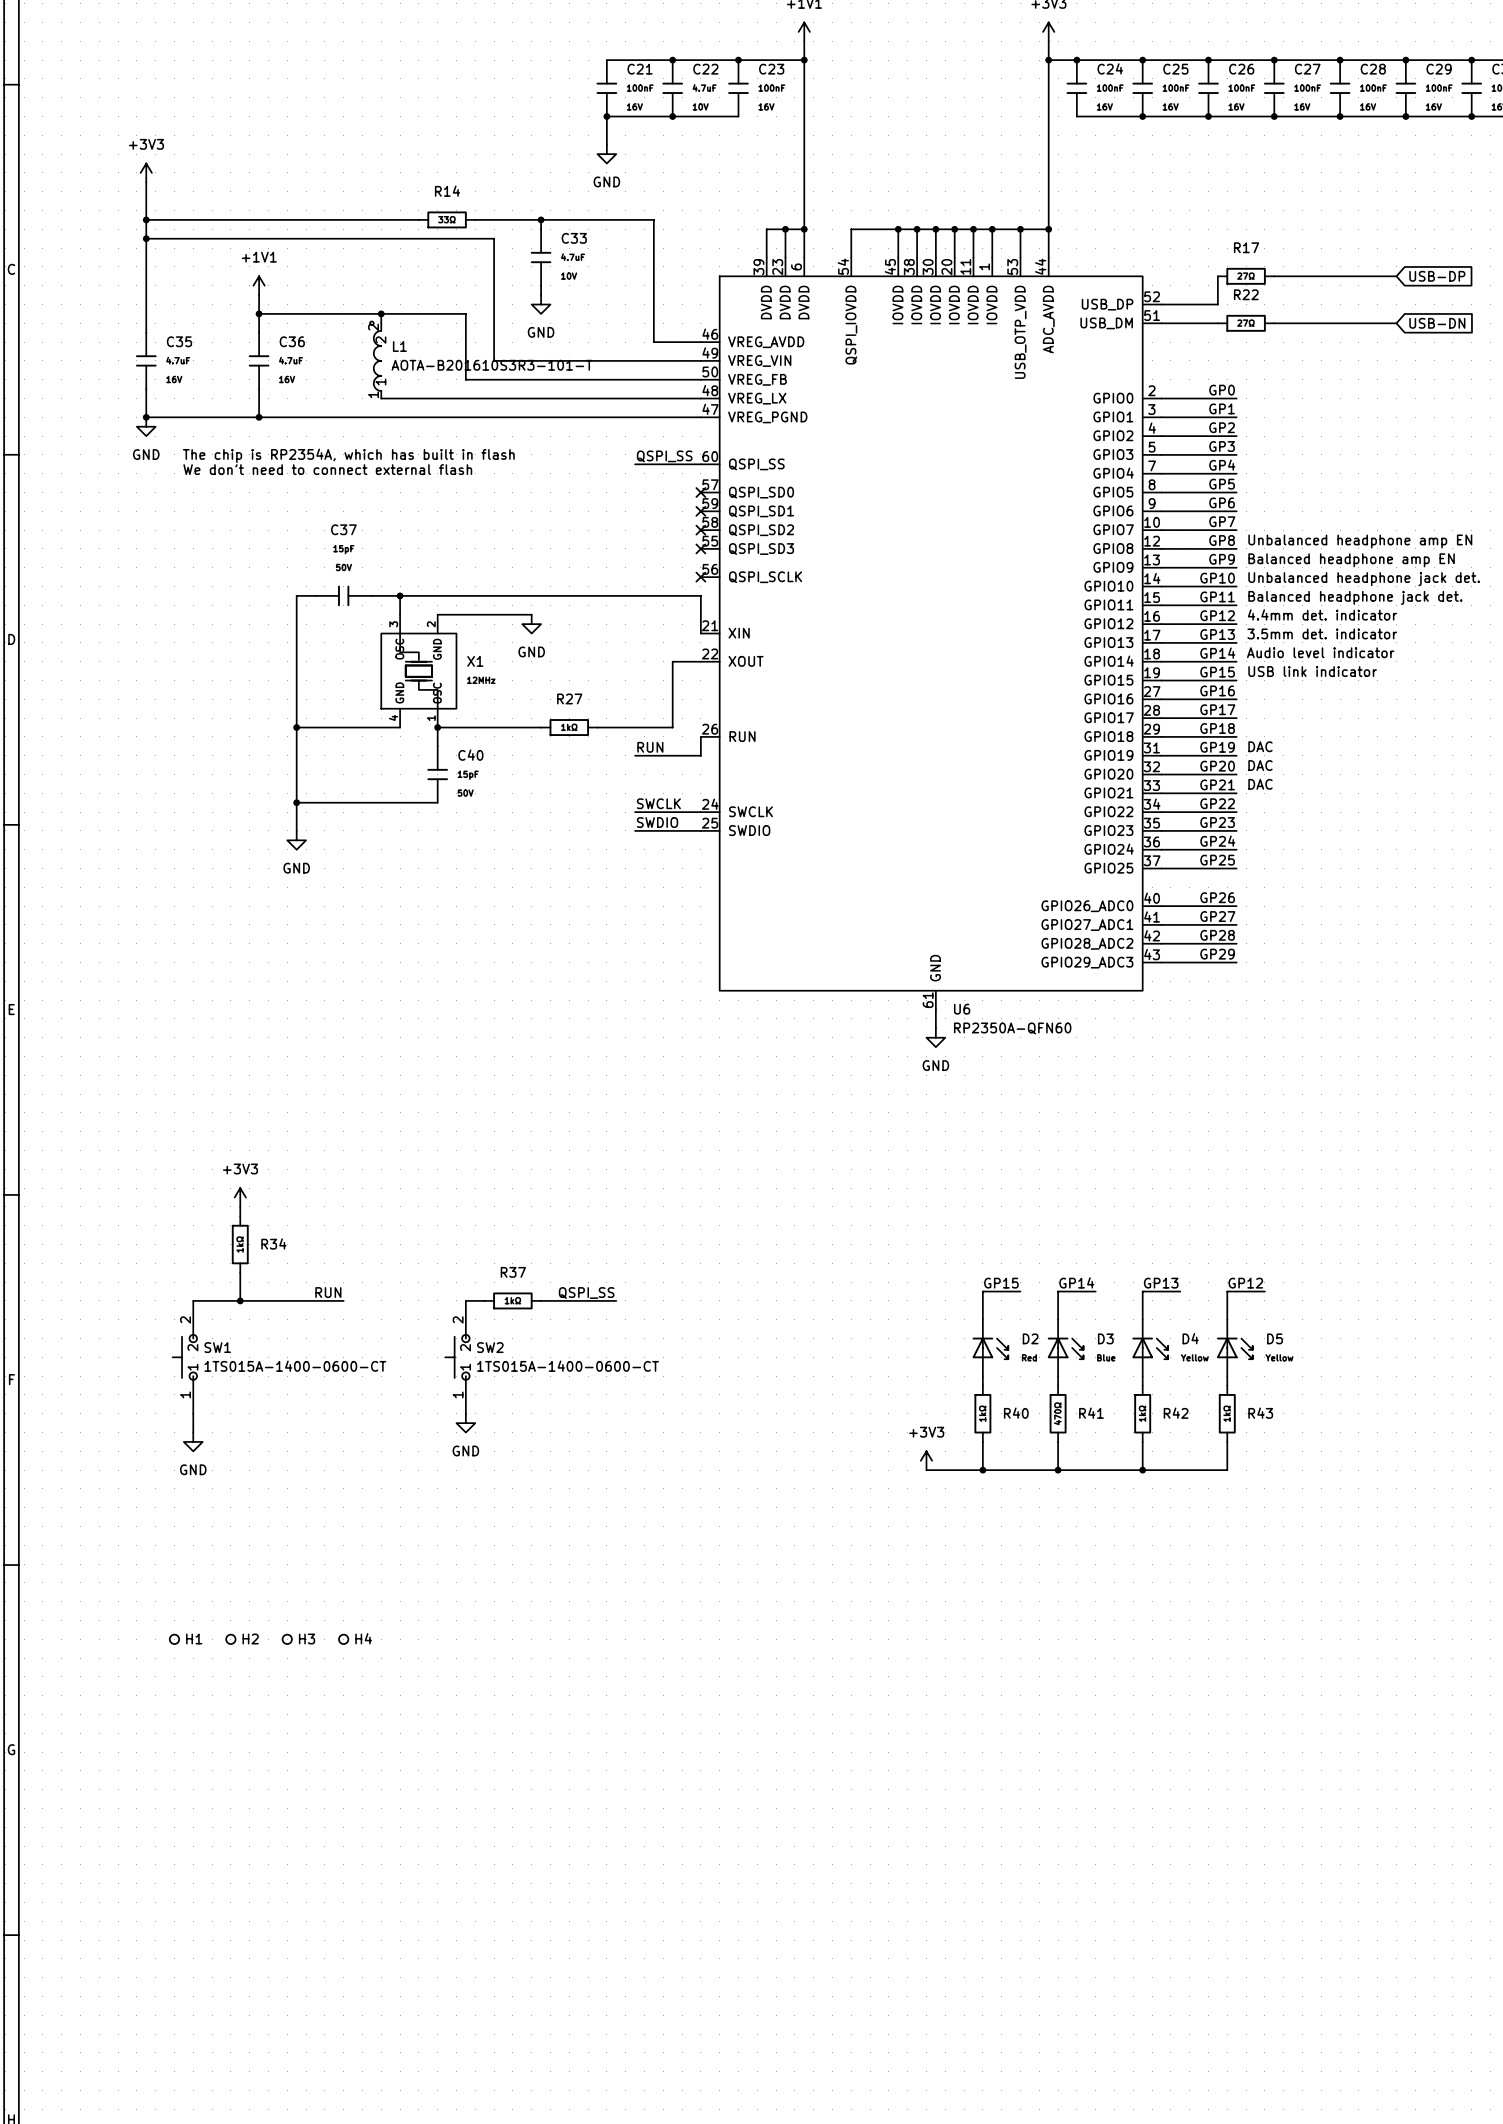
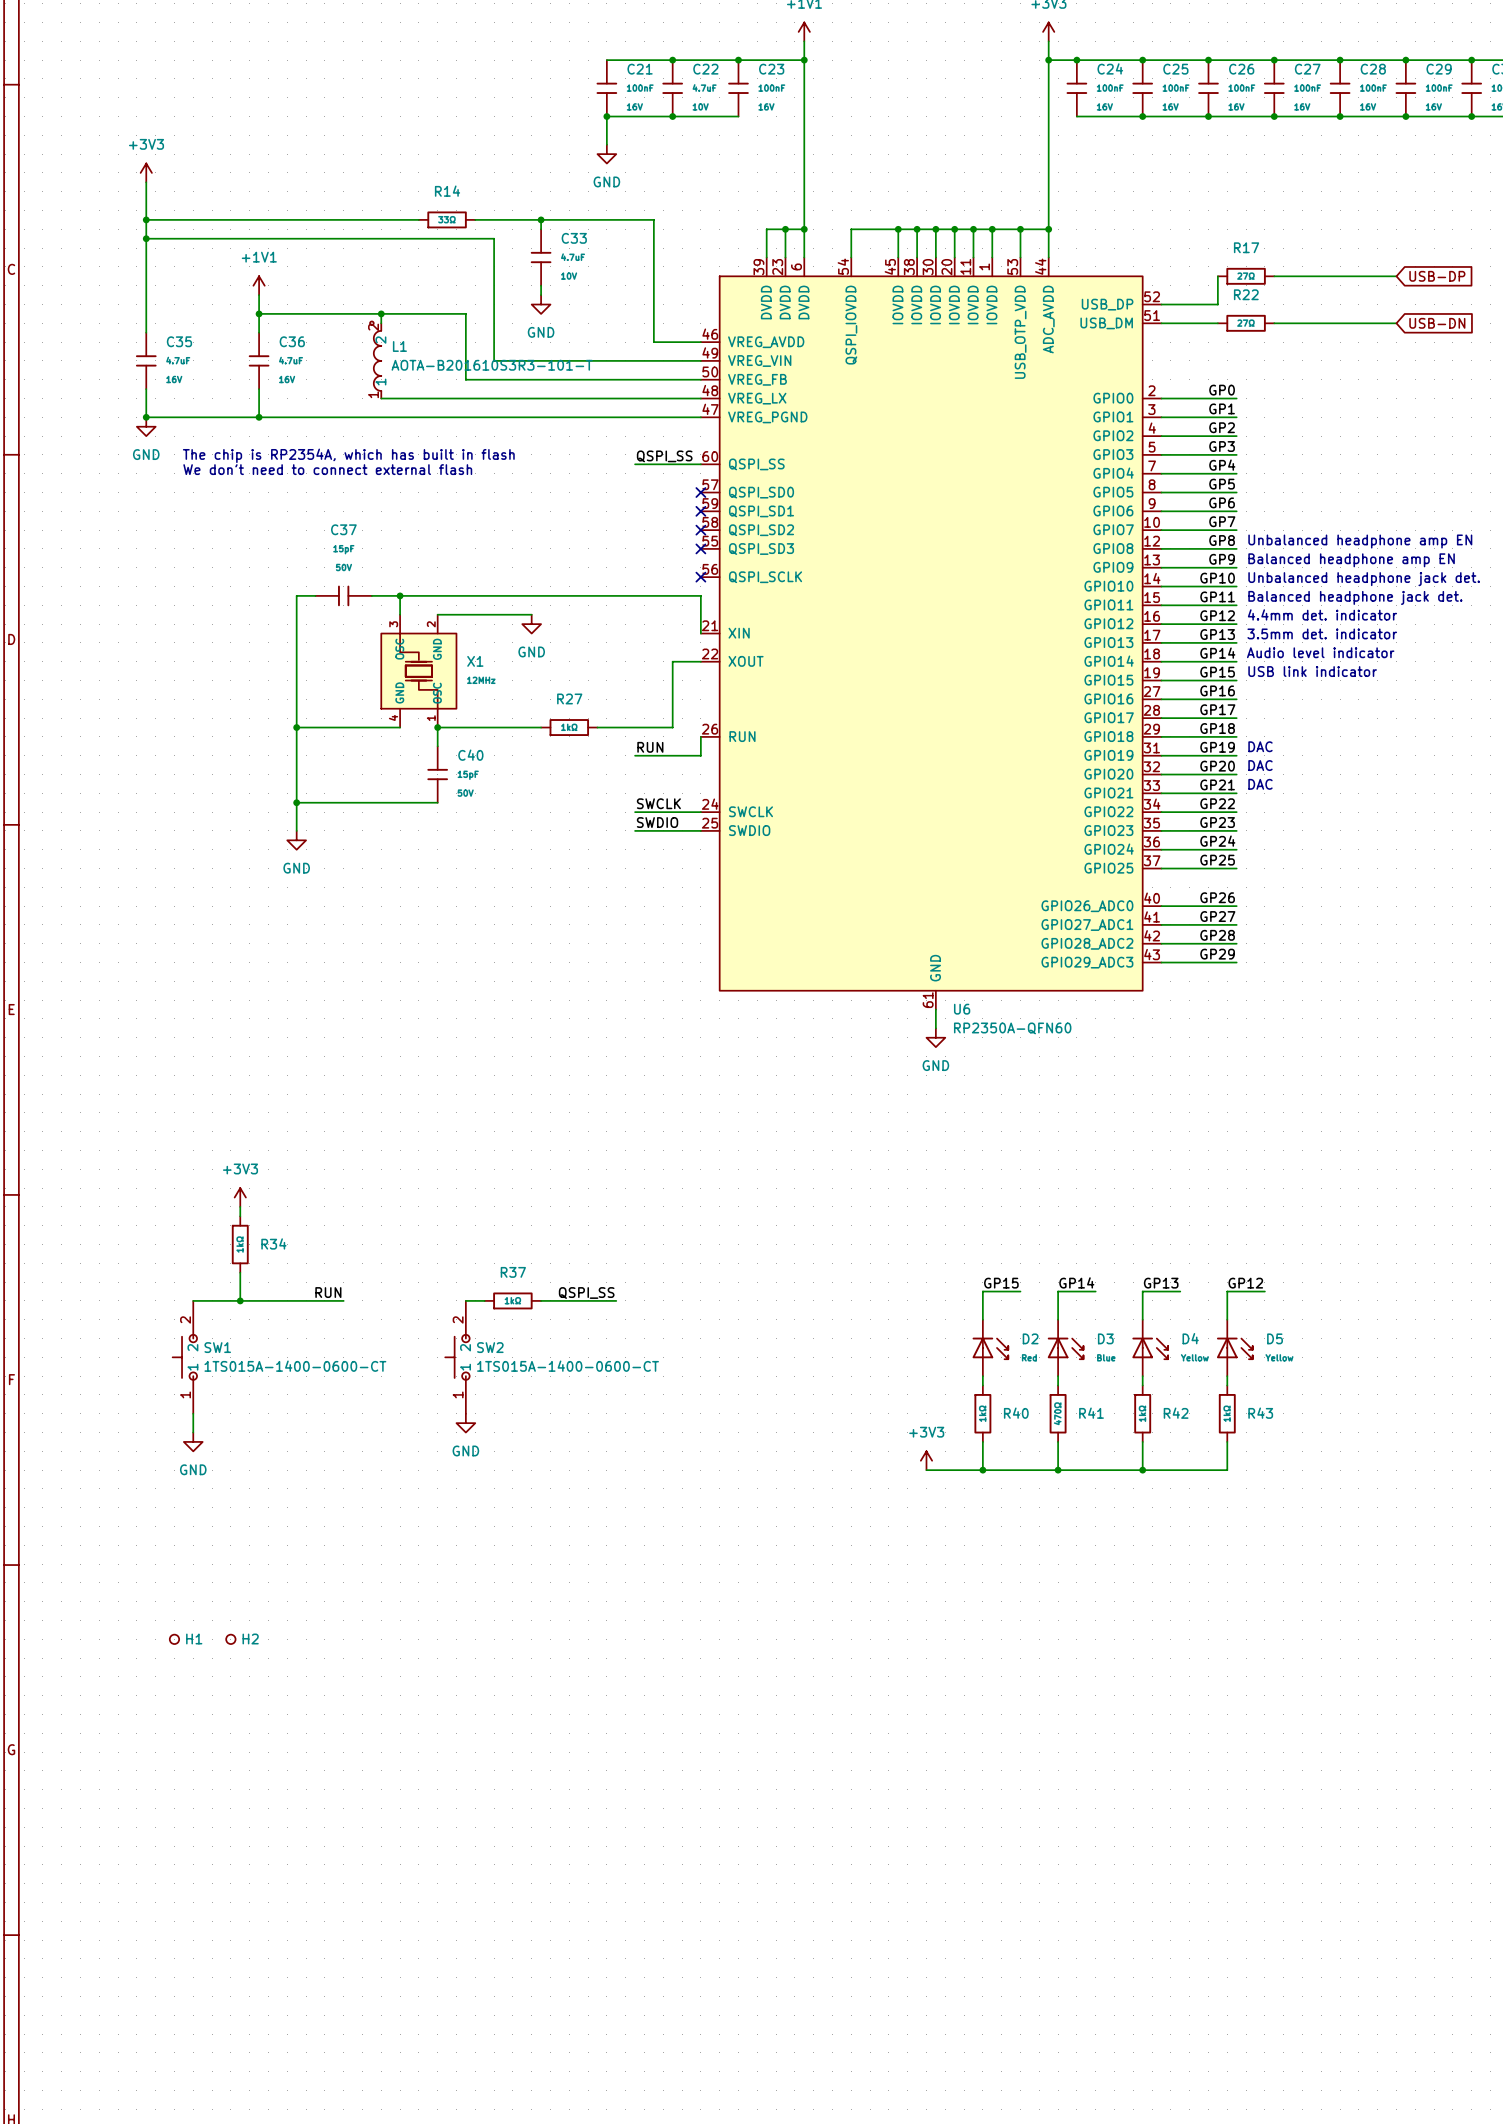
H3: (287, 1639) -> none
H4: (343, 1639) -> none

